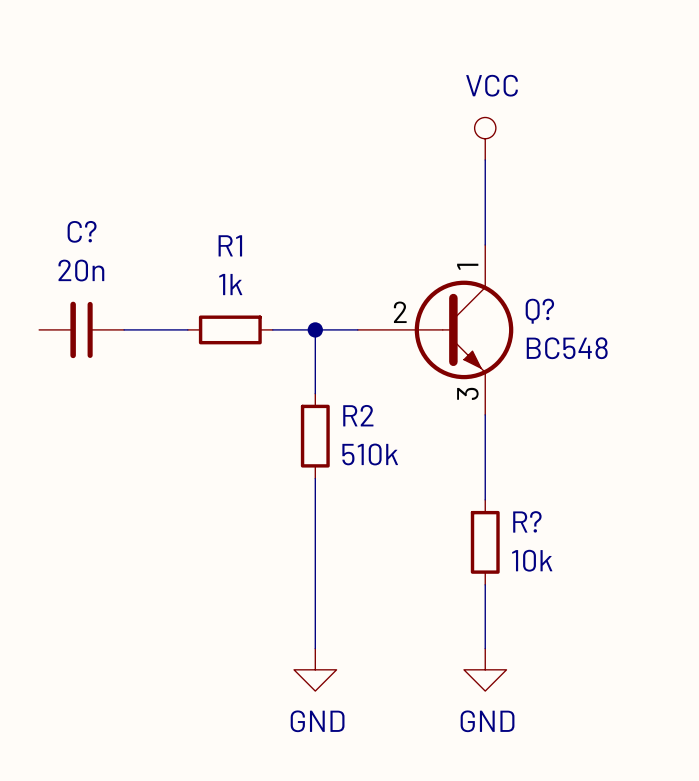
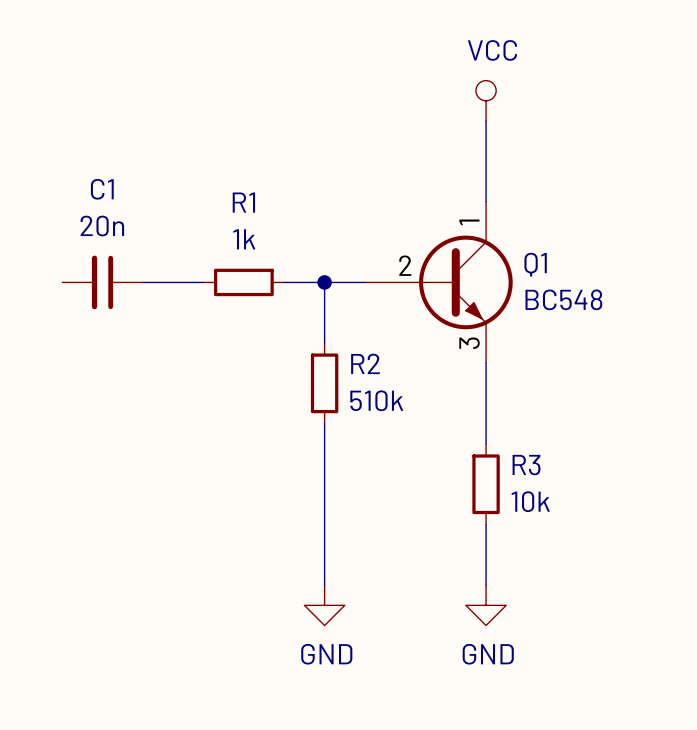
C? name: C? (82, 231) -> C1 (102, 189)
Q? name: Q? (539, 311) -> Q1 (535, 264)
R? name: R? (527, 521) -> R3 (526, 465)

